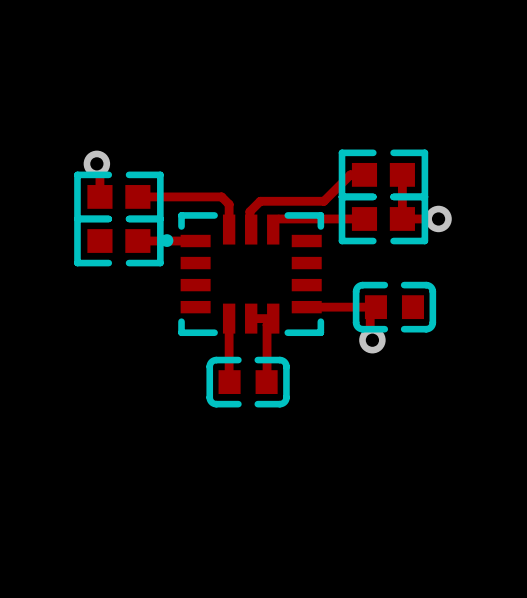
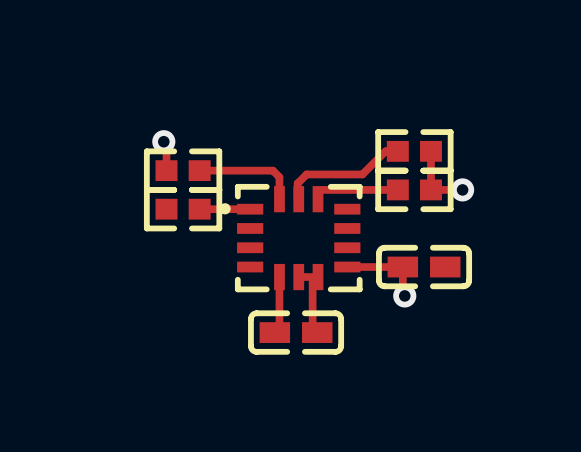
part footprint: [352, 281, 437, 333] -> [376, 244, 473, 290]
part footprint: [206, 356, 290, 408] -> [248, 310, 345, 355]

